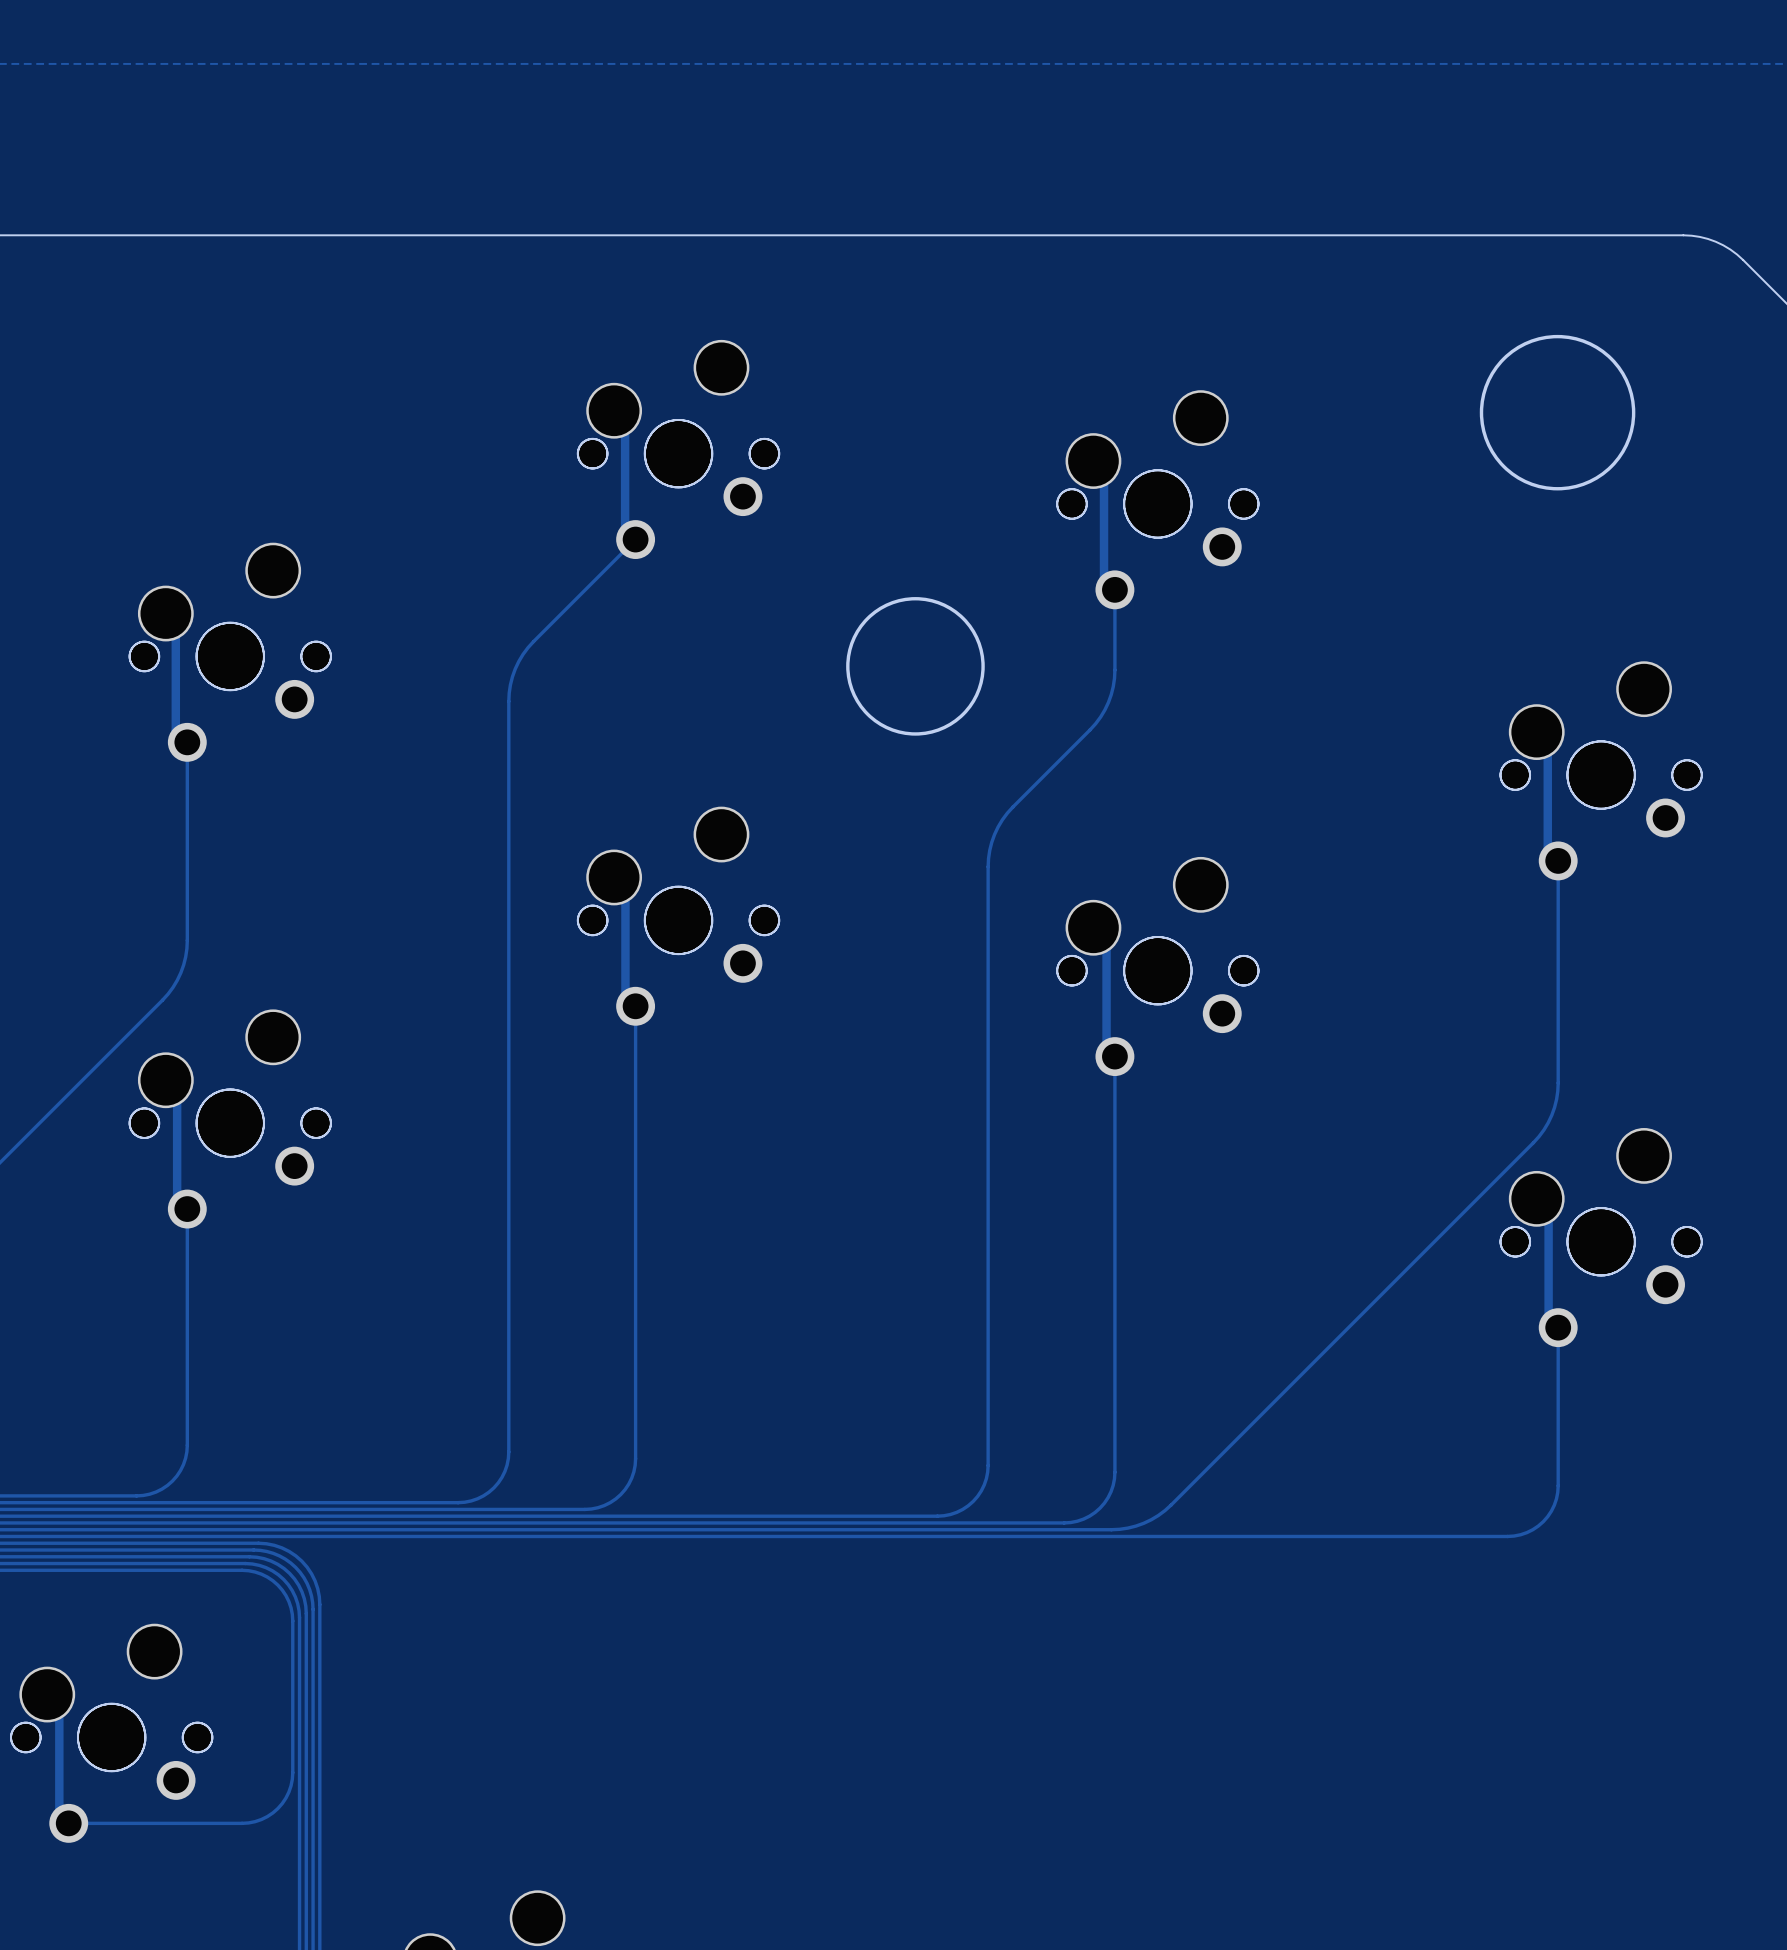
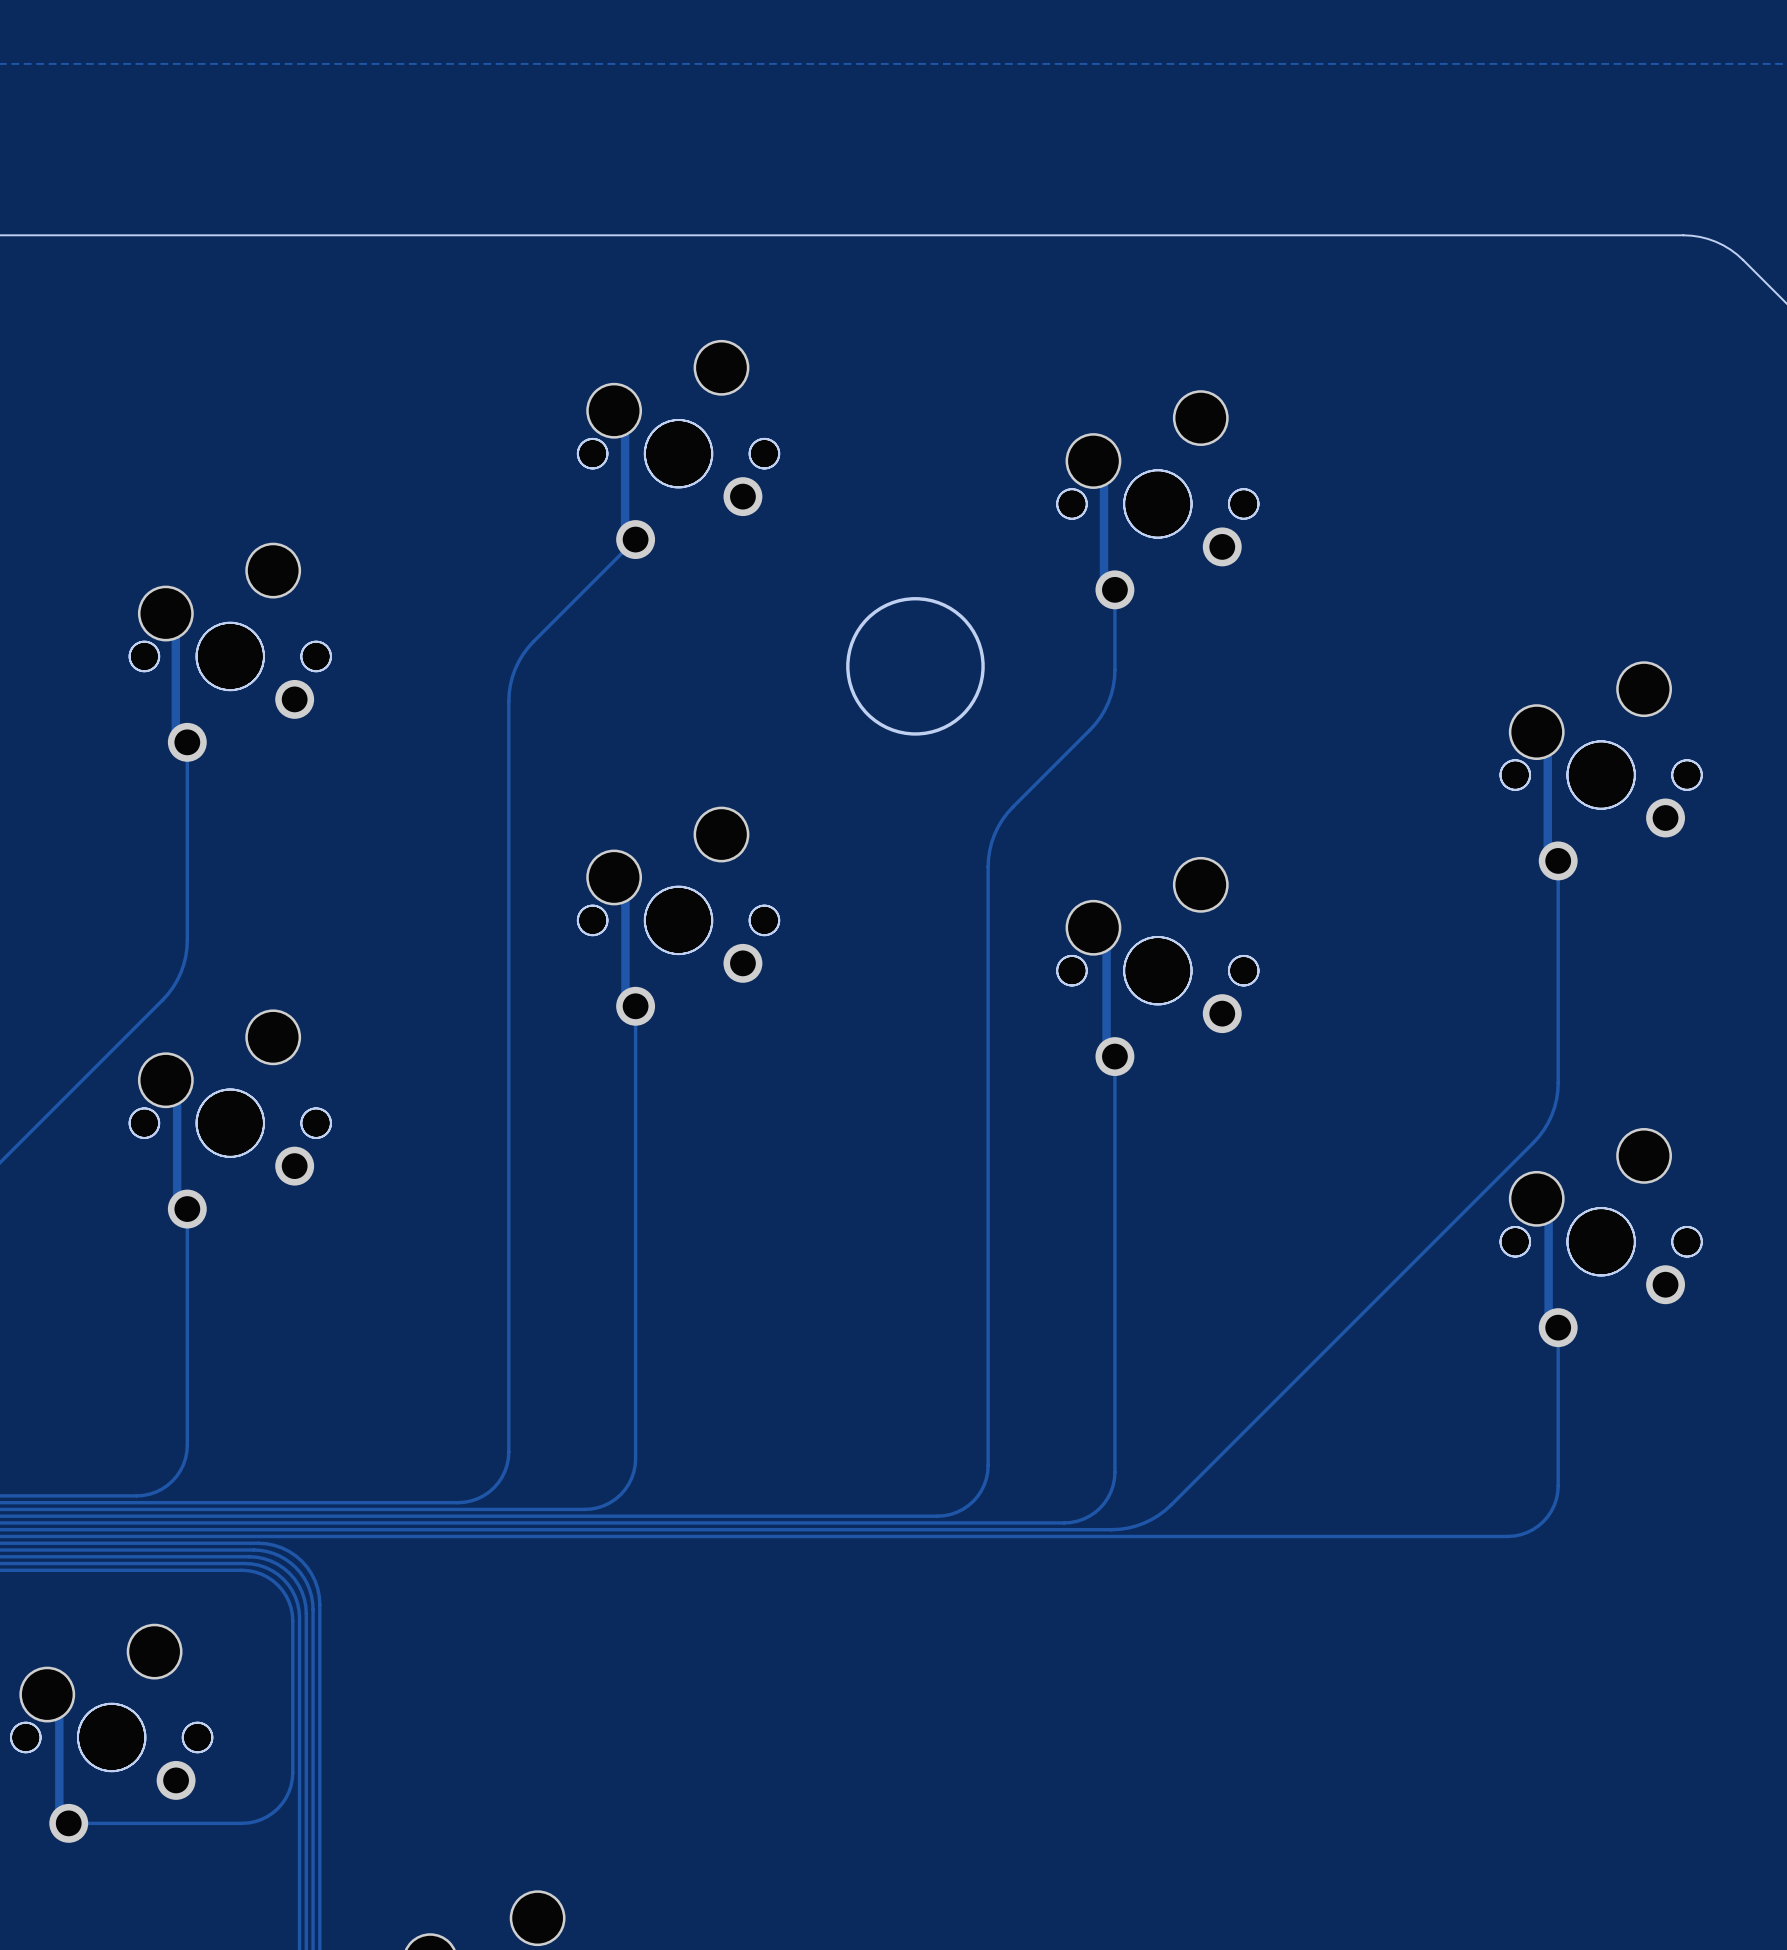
round board edge: [1479, 334, 1636, 491] -> none

